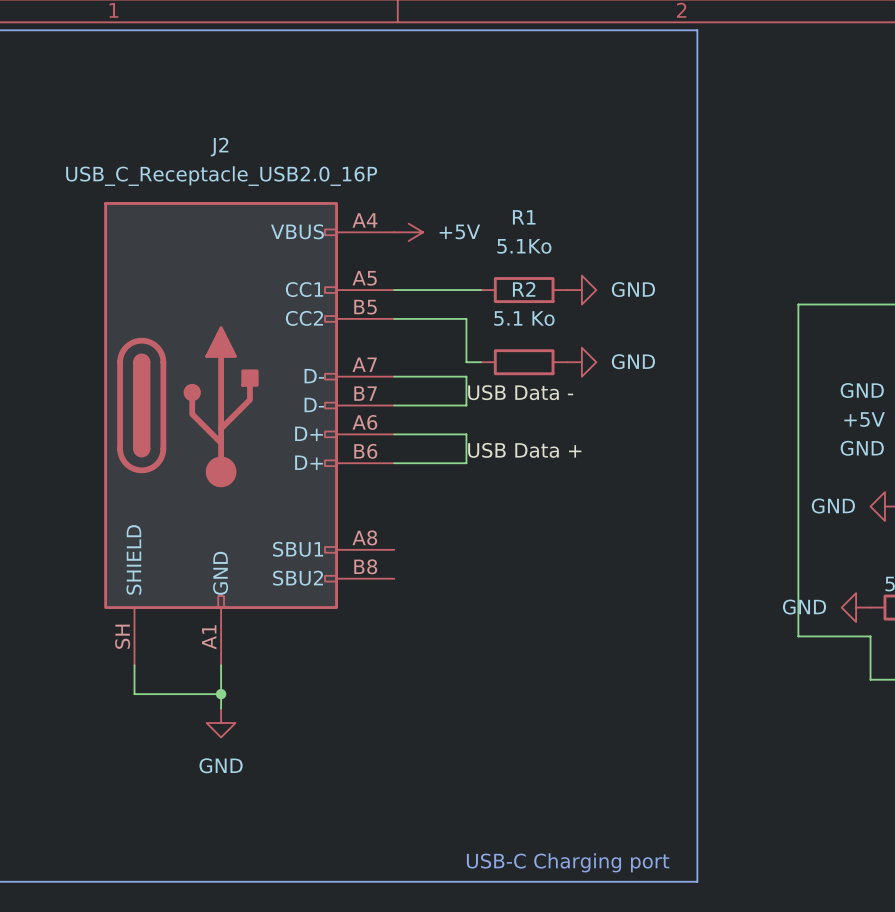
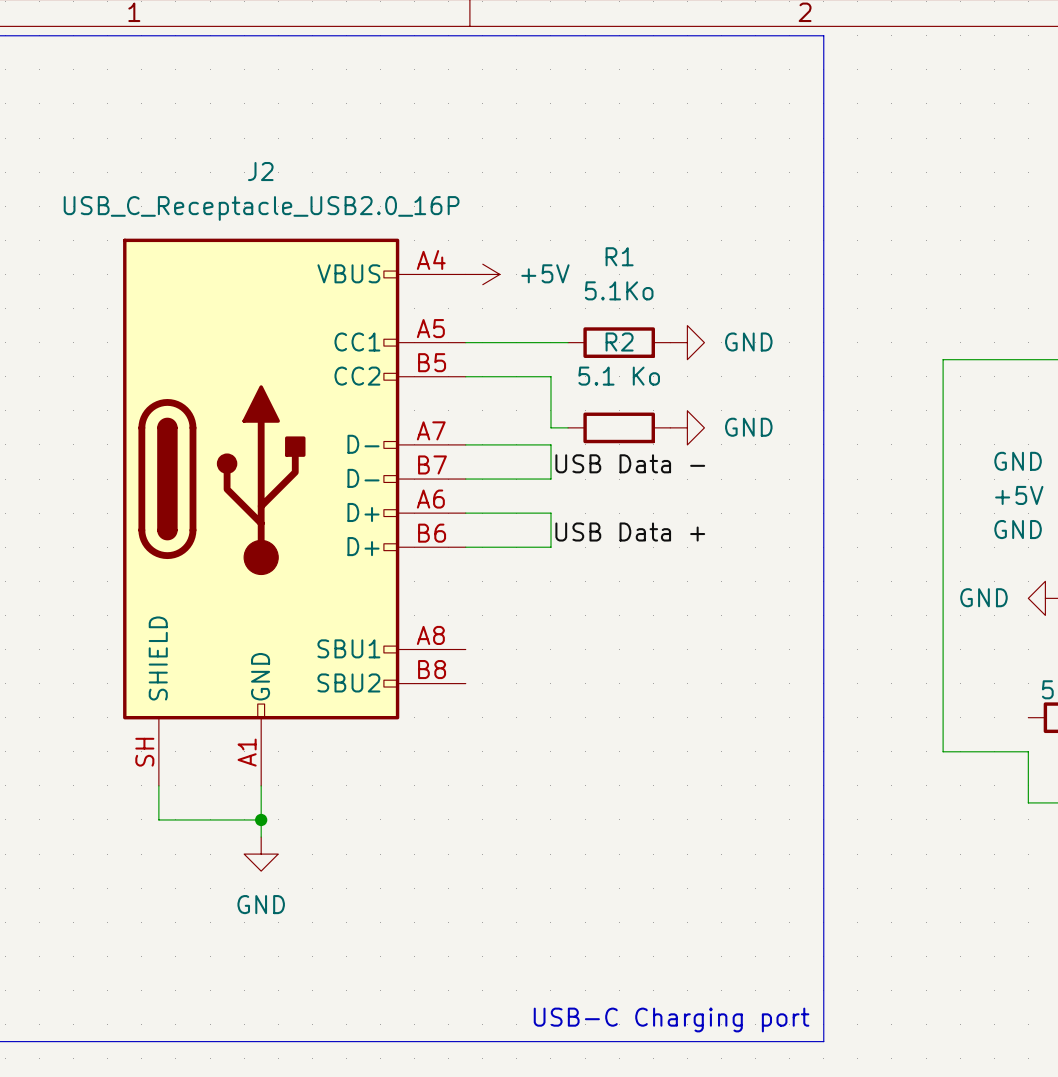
power symbol: GND (856, 607) -> none

